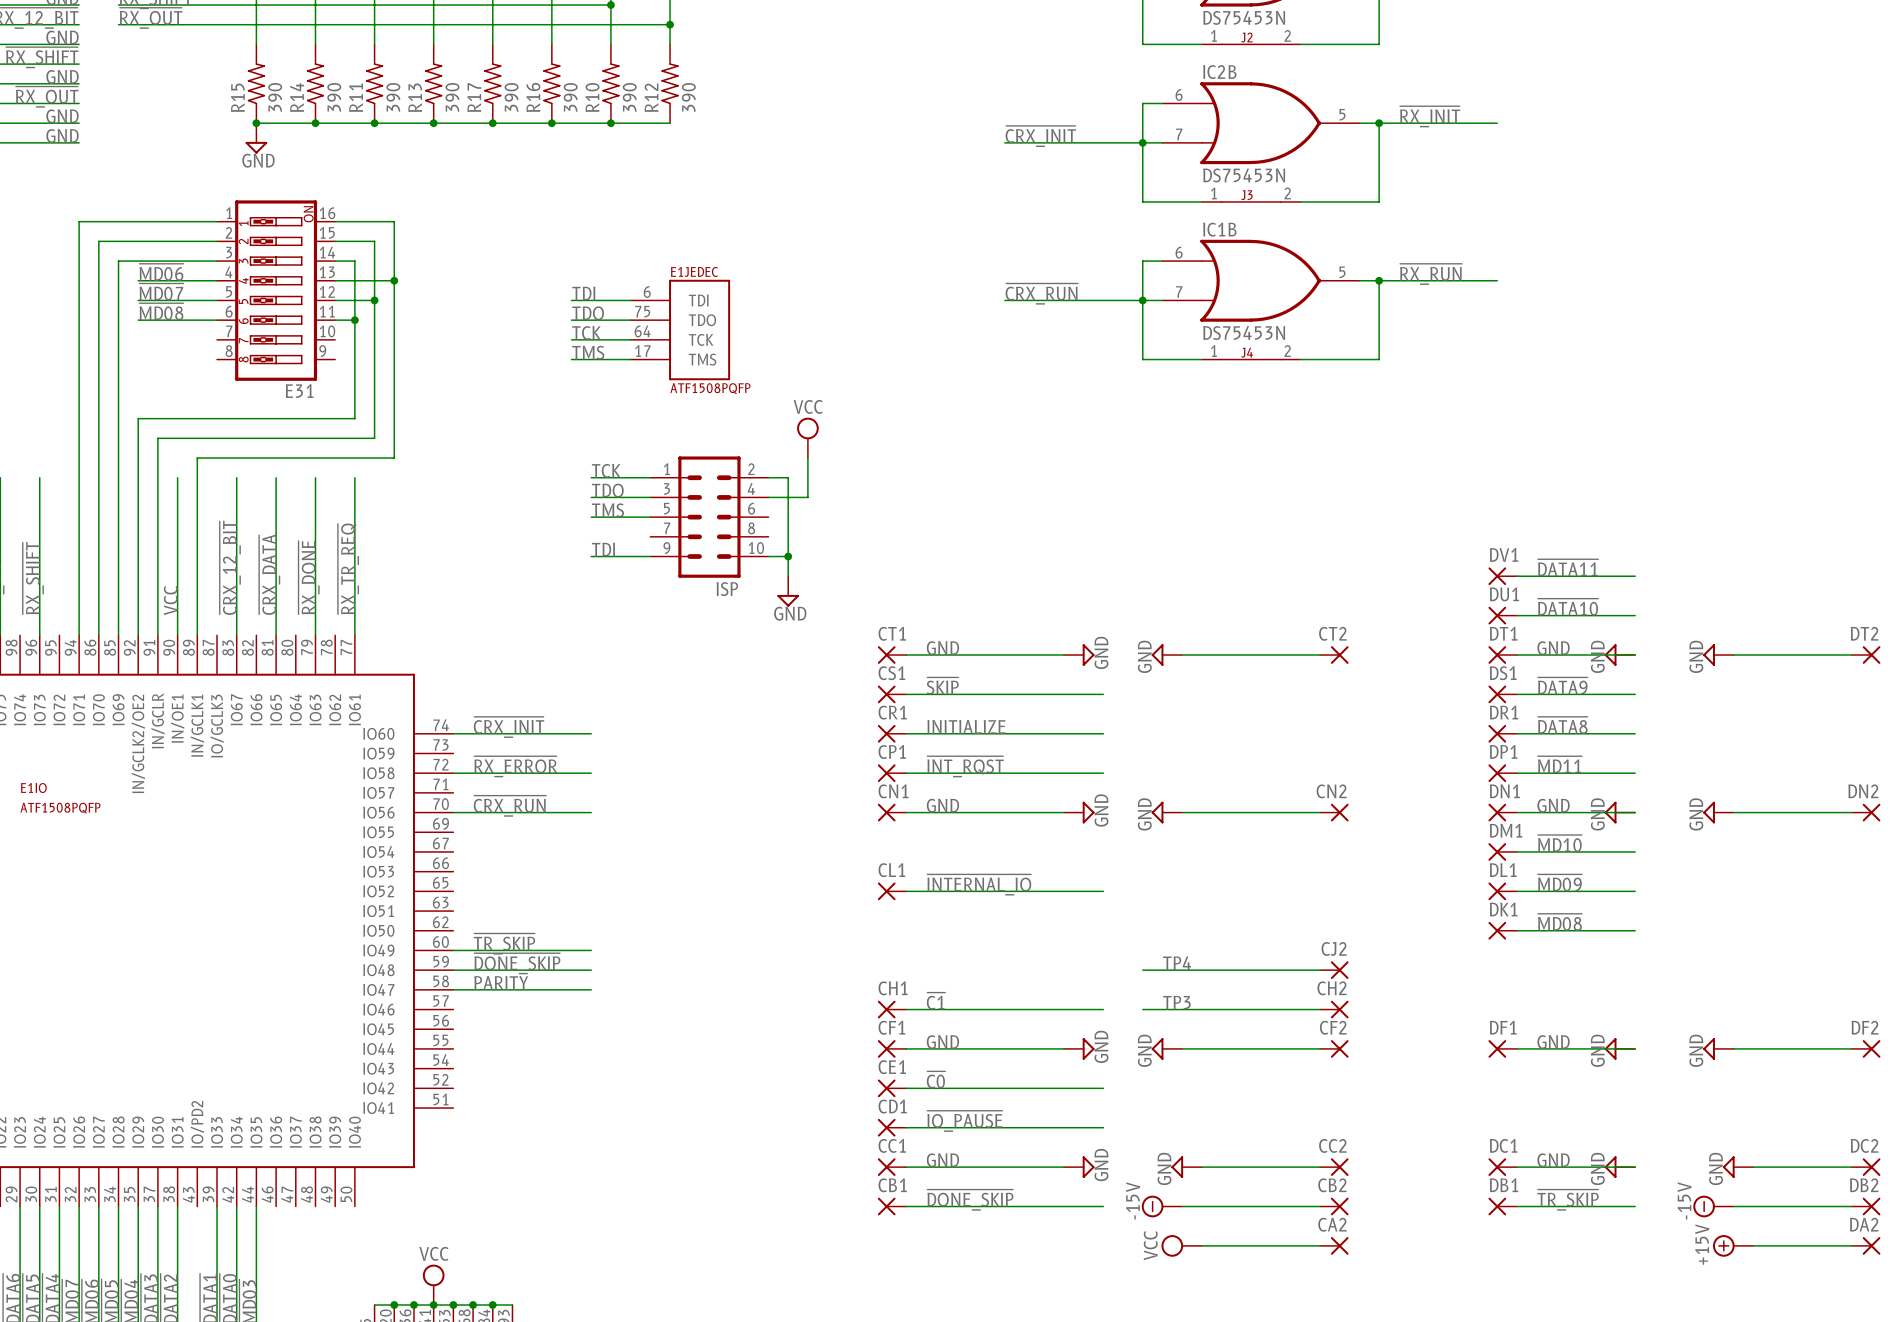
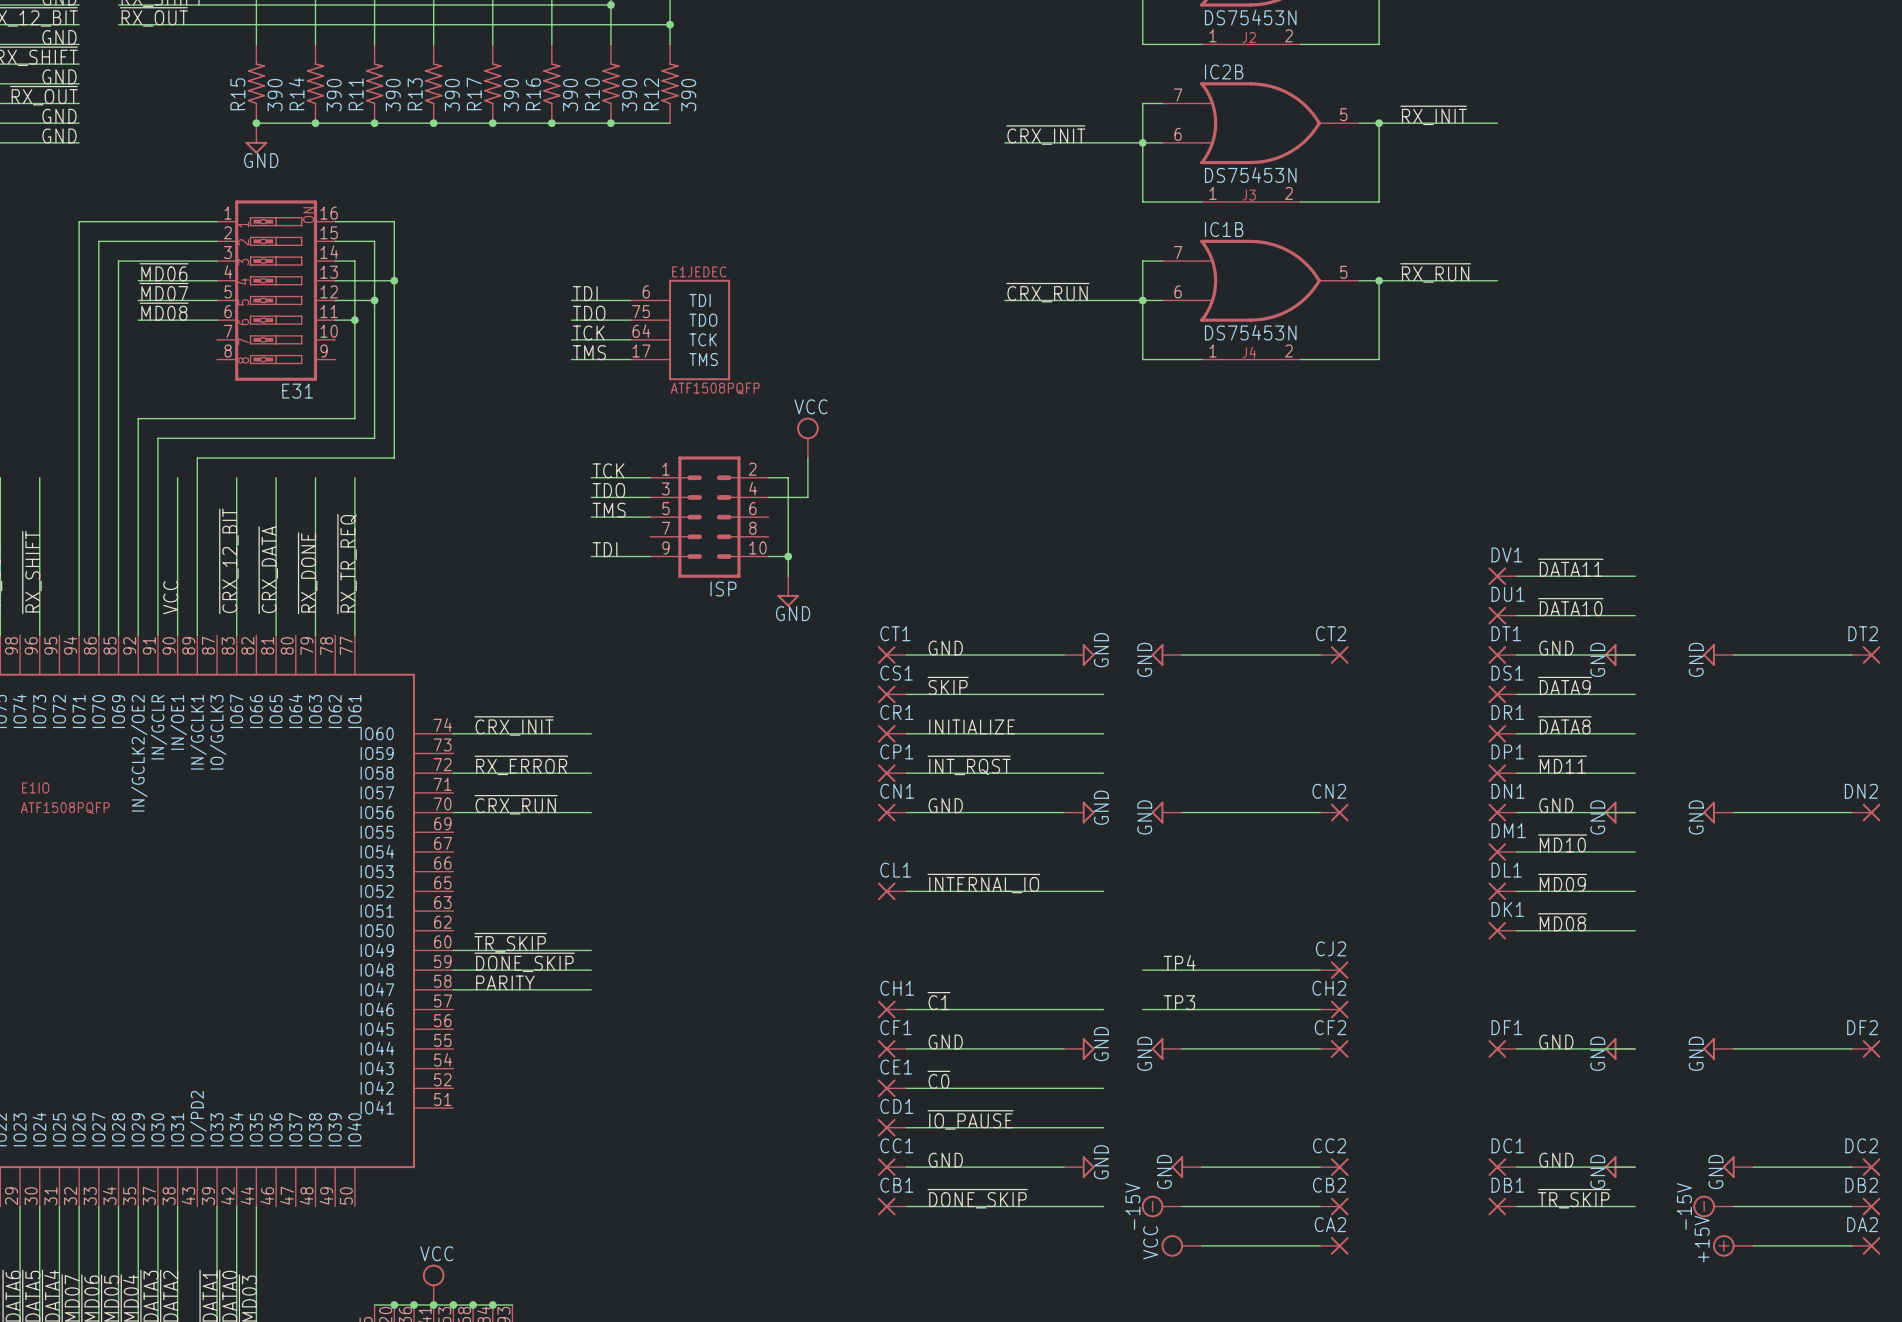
IC2B symbol: [1162, 82, 1360, 165] -> [1162, 82, 1360, 165]
IC1B symbol: [1162, 239, 1360, 322] -> [1162, 239, 1360, 322]

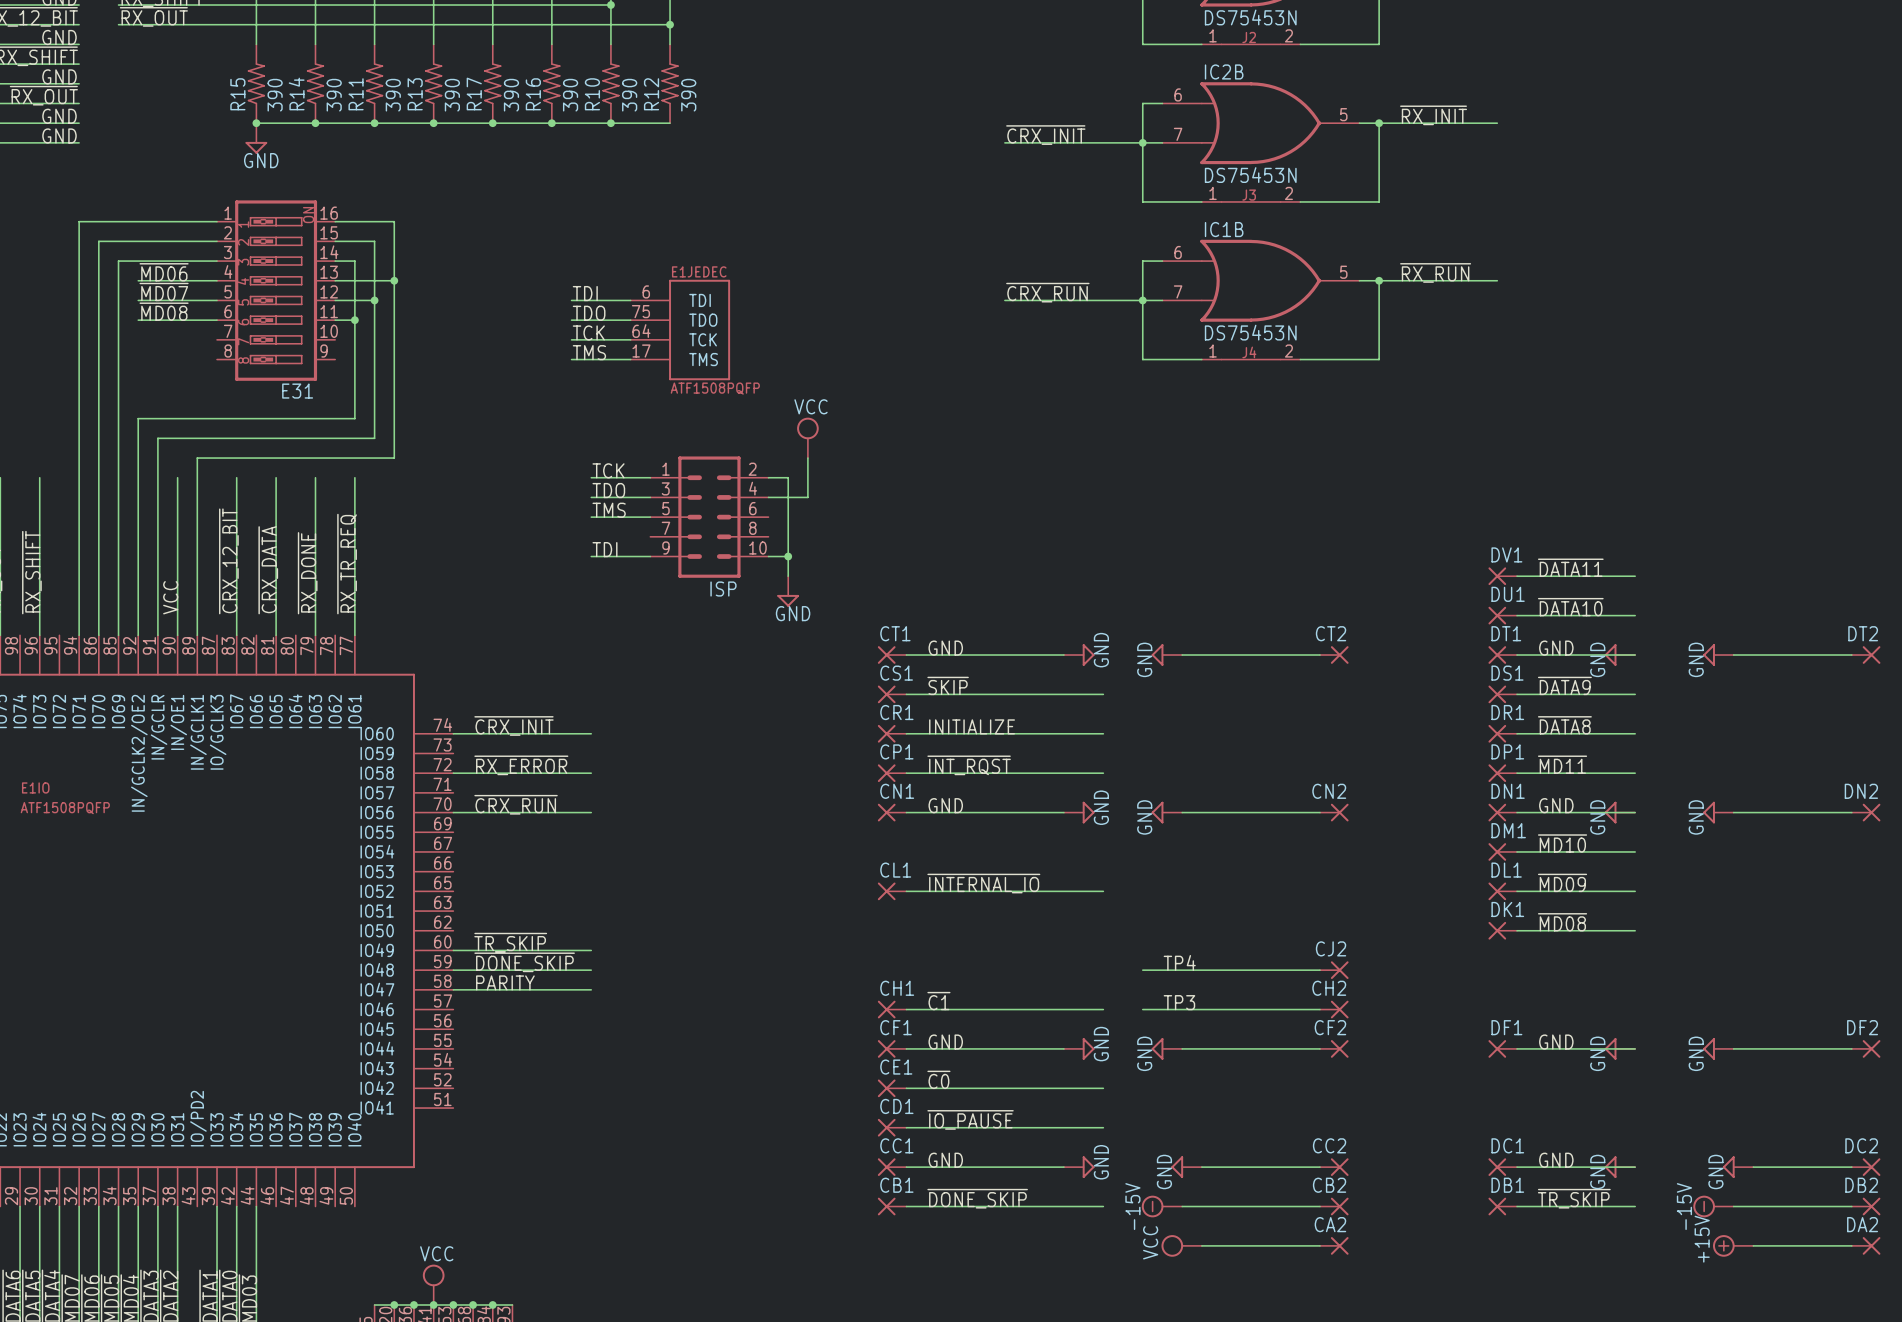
IC2B symbol: [1162, 82, 1360, 165] -> [1162, 82, 1360, 165]
IC1B symbol: [1162, 239, 1360, 322] -> [1162, 239, 1360, 322]

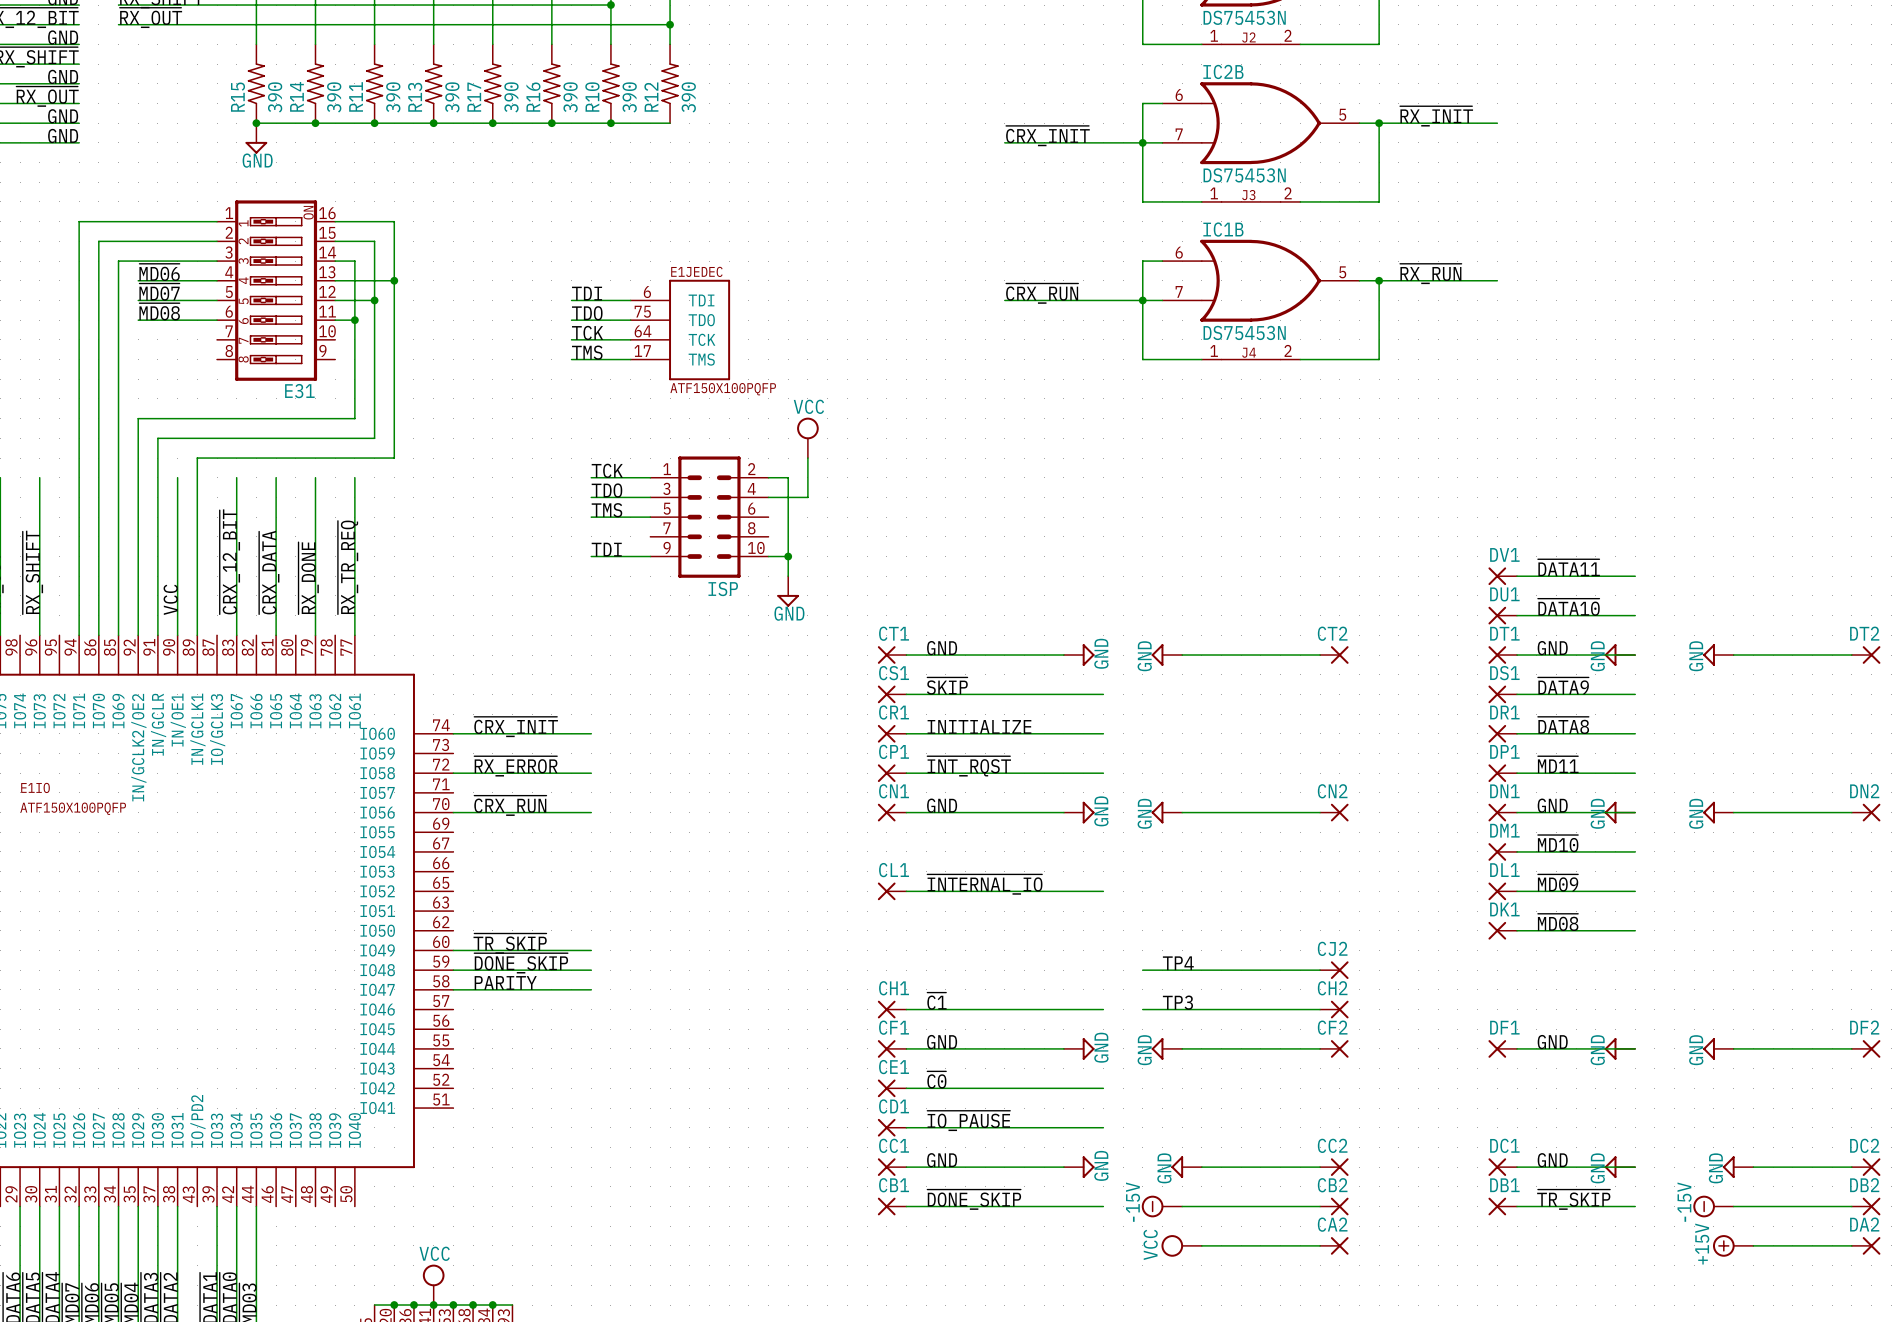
E1JEDEC value: ATF1508PQFP (715, 388) -> ATF150X100PQFP (723, 389)
E1IO value: ATF1508PQFP (65, 808) -> ATF150X100PQFP (73, 808)

